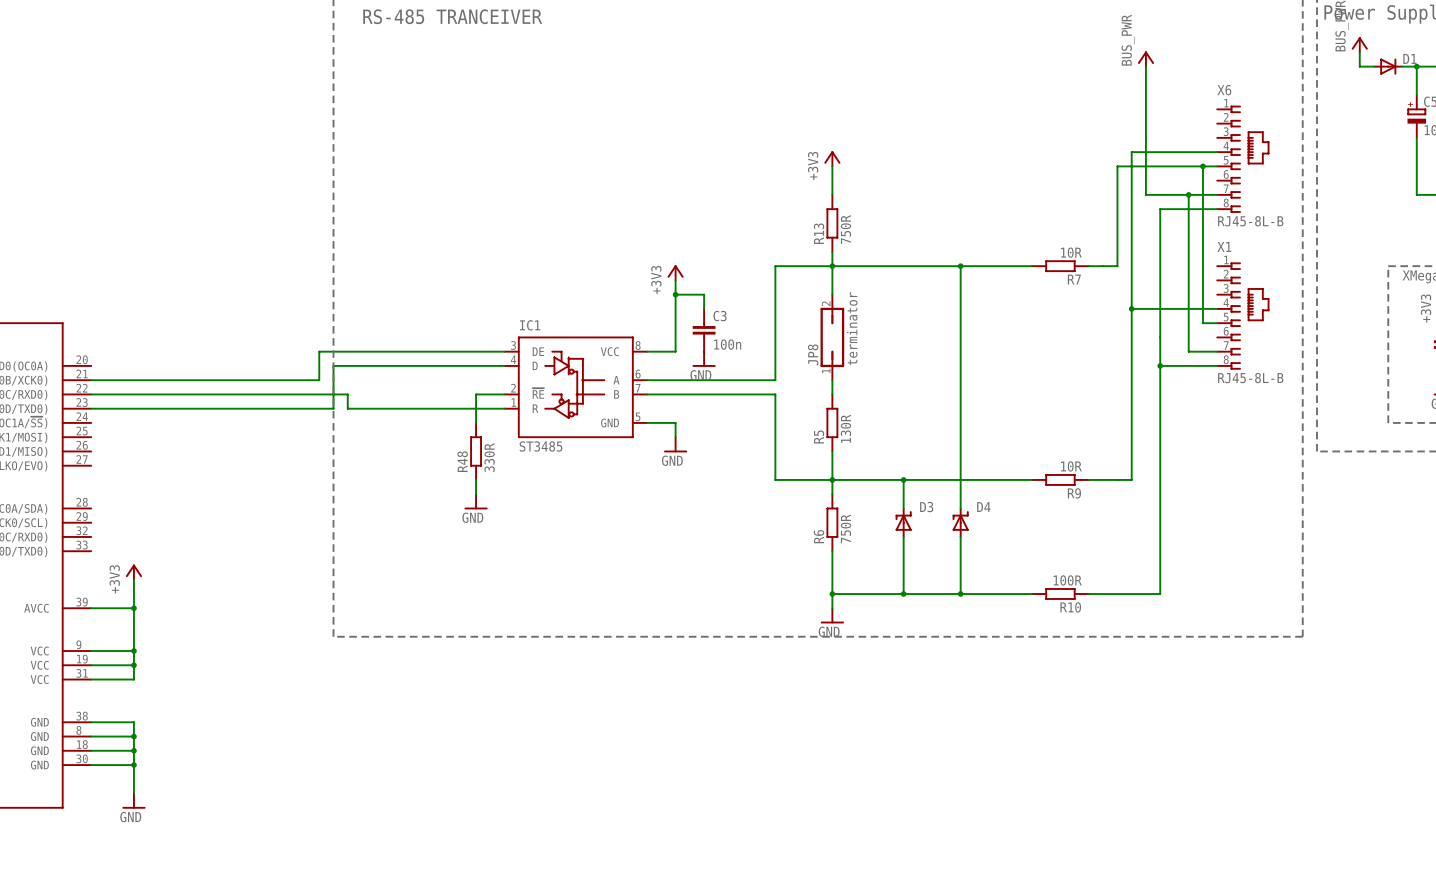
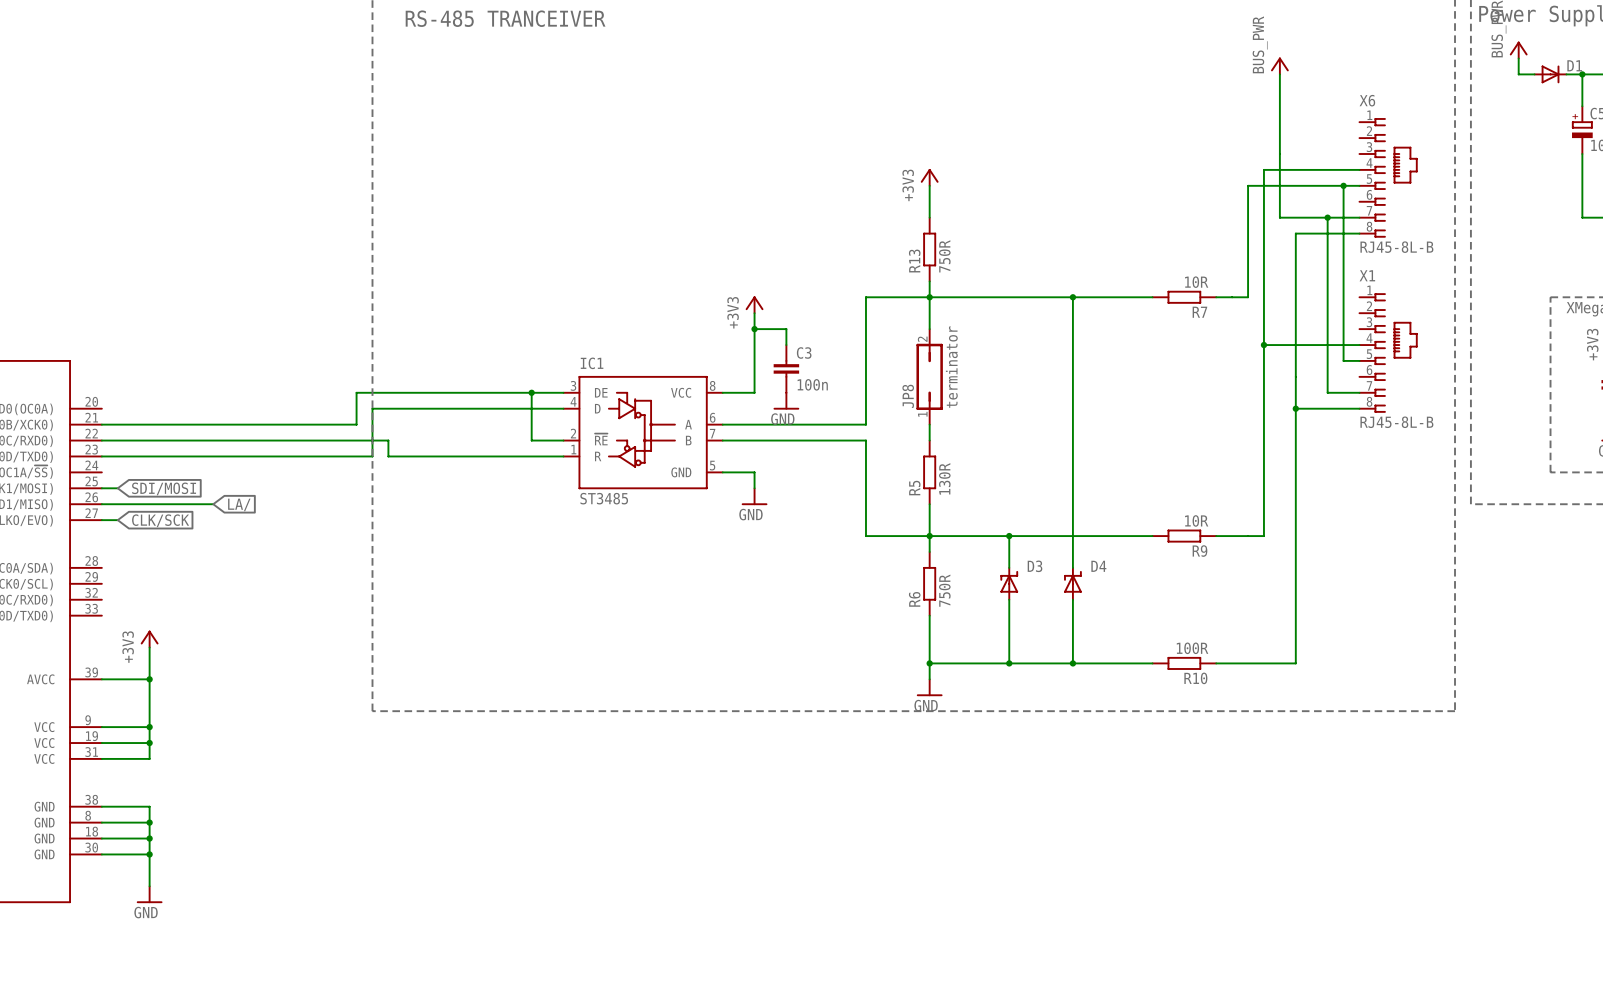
junction: none -> (531, 392)
wire: (476, 394) (476, 422) -> (531, 440) (531, 392)
wire: none -> (101, 488) (117, 488)
global label: none -> SDI/MOSI (164, 488)
wire: none -> (101, 504) (213, 504)
R48: 330R (476, 451) -> none
global label: none -> LA/ (239, 504)
wire: none -> (101, 520) (117, 520)
global label: none -> CLK/SCK (160, 520)
wire: (476, 479) (476, 494) -> none
power symbol: GND (476, 501) -> none

